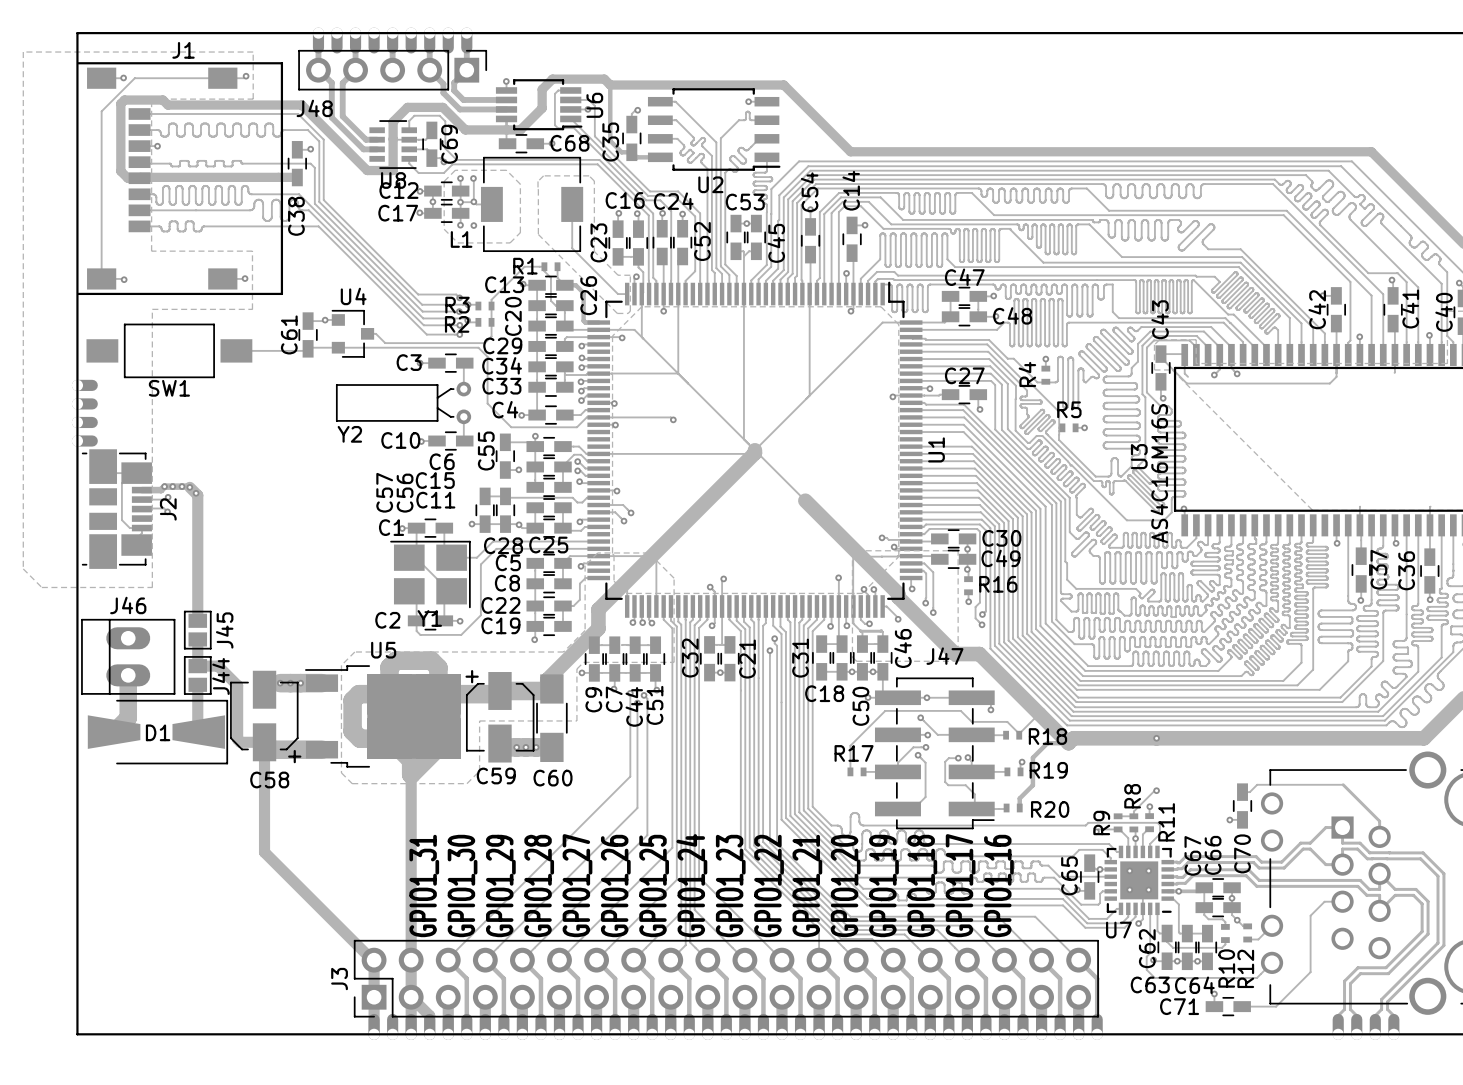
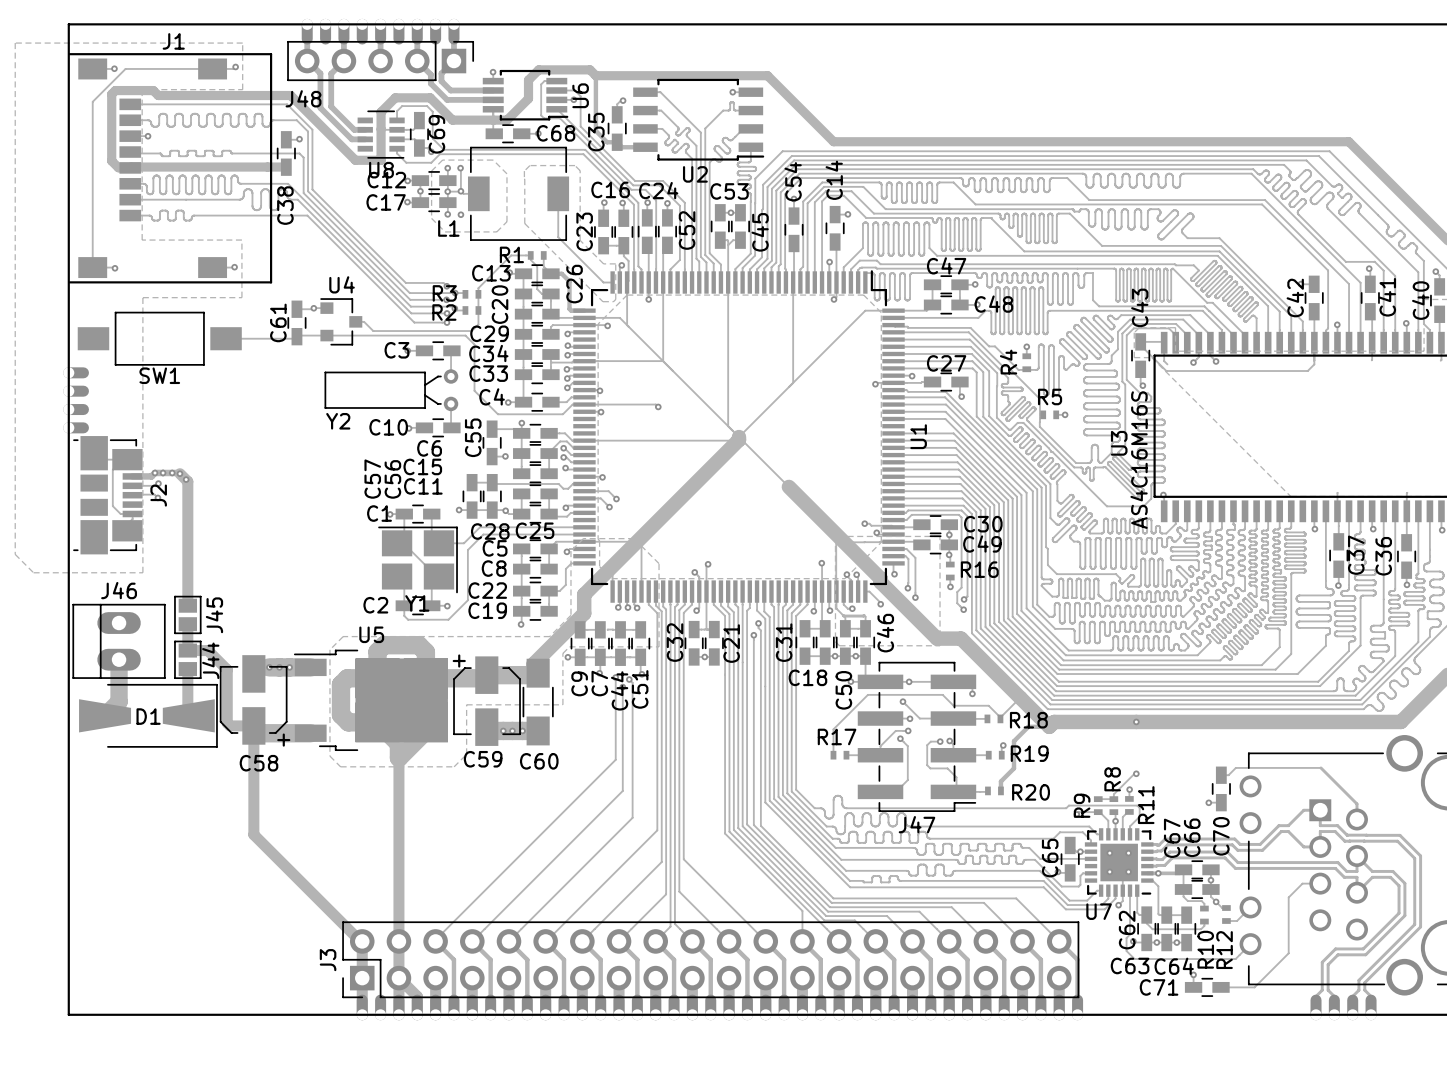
J47 name position: J47 (944, 656) -> J47 (916, 824)
text: GPIO1_31 (424, 885) -> none
text: GPIO1_30 (462, 885) -> none
text: GPIO1_29 (500, 885) -> none
text: GPIO1_28 (539, 885) -> none
text: GPIO1_27 (577, 885) -> none
text: GPIO1_26 (615, 885) -> none
text: GPIO1_25 (654, 885) -> none
text: GPIO1_24 (691, 885) -> none
text: GPIO1_23 (730, 885) -> none
text: GPIO1_22 (769, 885) -> none
text: GPIO1_21 (807, 885) -> none
text: GPIO1_20 (845, 885) -> none
text: GPIO1_19 (884, 885) -> none
text: GPIO1_18 (922, 885) -> none
text: GPIO1_17 (960, 885) -> none
text: GPIO1_16 (998, 885) -> none

